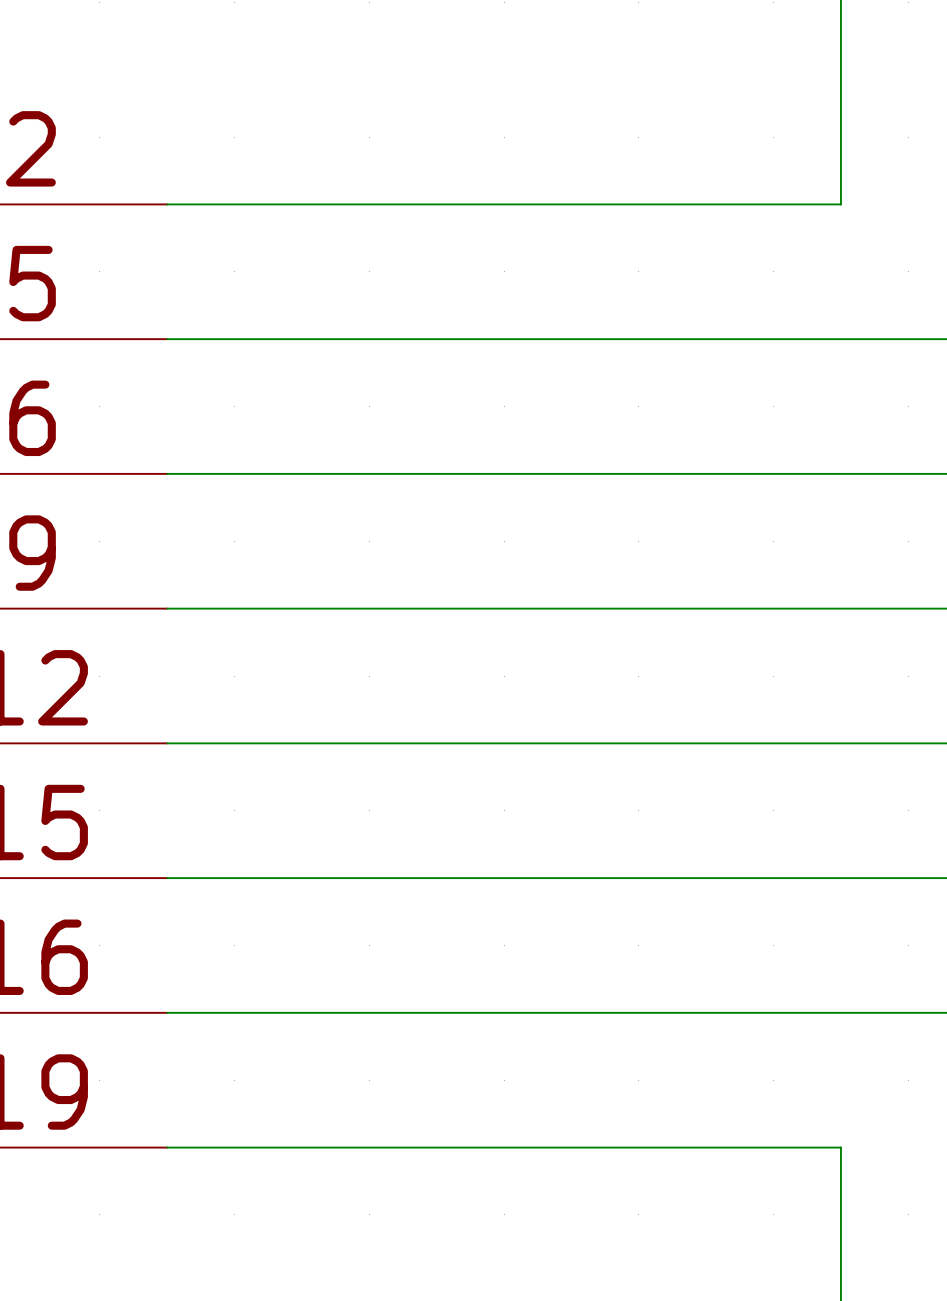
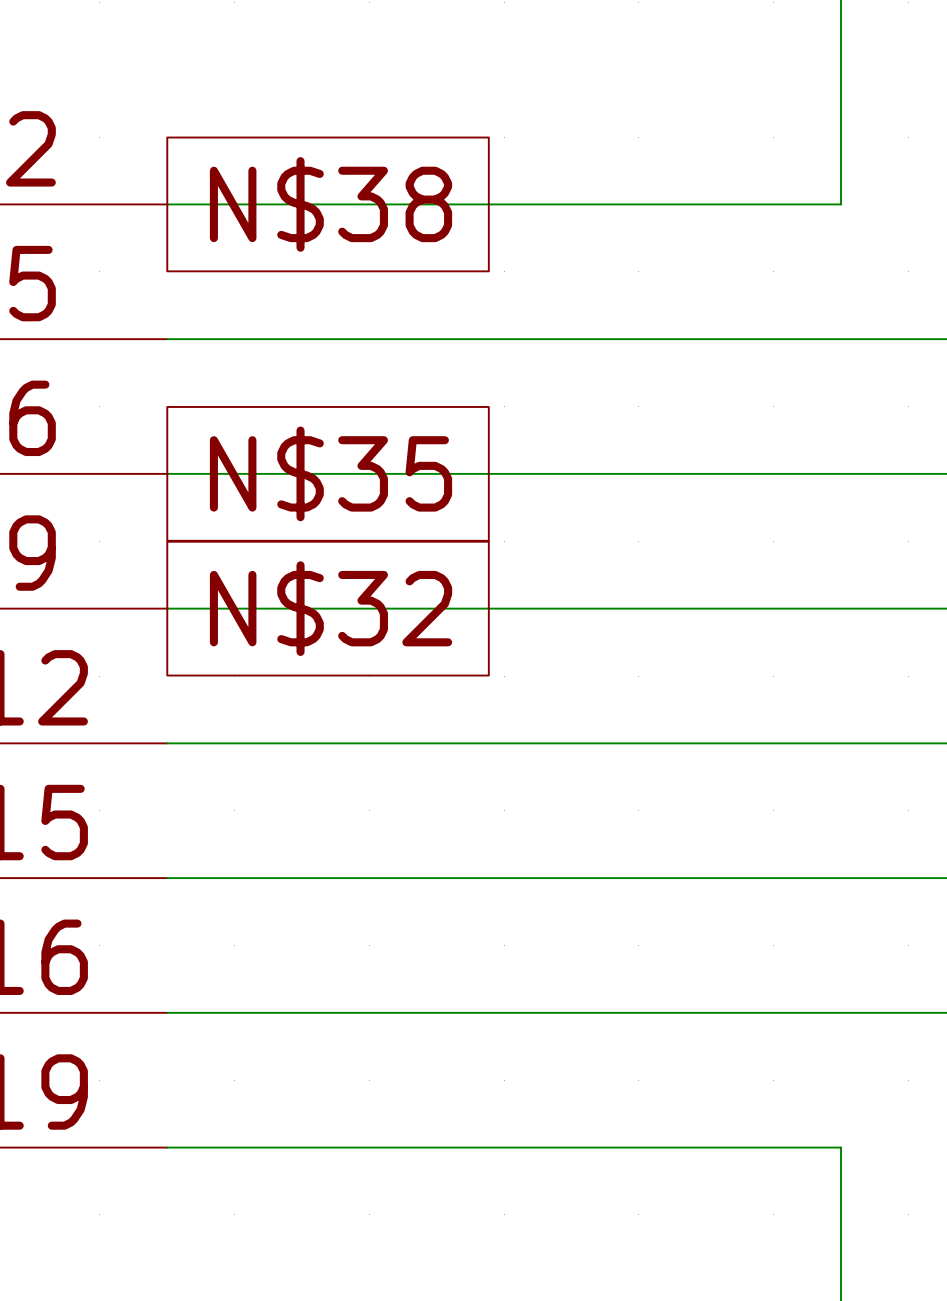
global label: none -> N$38 (331, 204)
global label: none -> N$35 (331, 473)
global label: none -> N$32 (331, 608)

